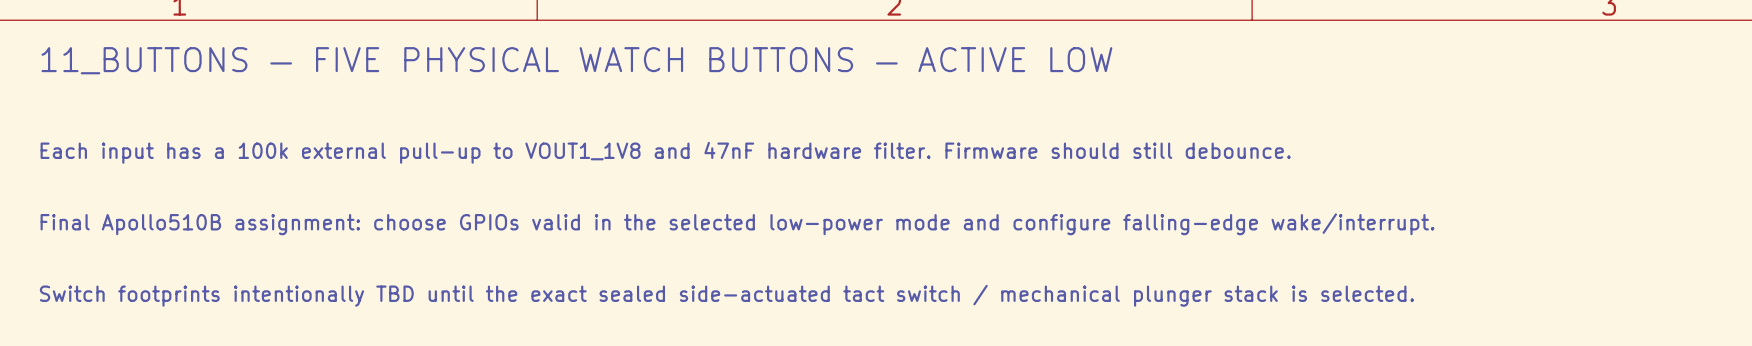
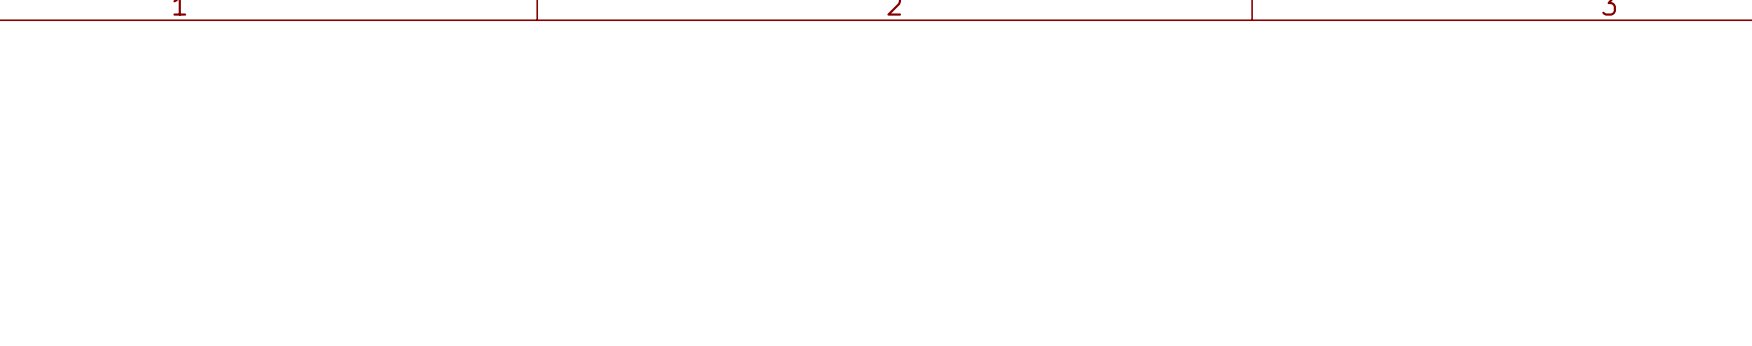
text: 11_BUTTONS — FIVE PHYSICAL WATCH BUTTONS — ACTIVE LOW (576, 60) -> none
text: Each input has a 100k external pull-up to VOUT1_1V8 and 47nF hardware filter. Firmware should still debounce. (665, 152) -> none
text: Final Apollo510B assignment: choose GPIOs valid in the selected low-power mode and configure falling-edge wake/interrupt. (737, 224) -> none
text: Switch footprints intentionally TBD until the exact sealed side-actuated tact switch / mechanical plunger stack is selected. (726, 295) -> none

